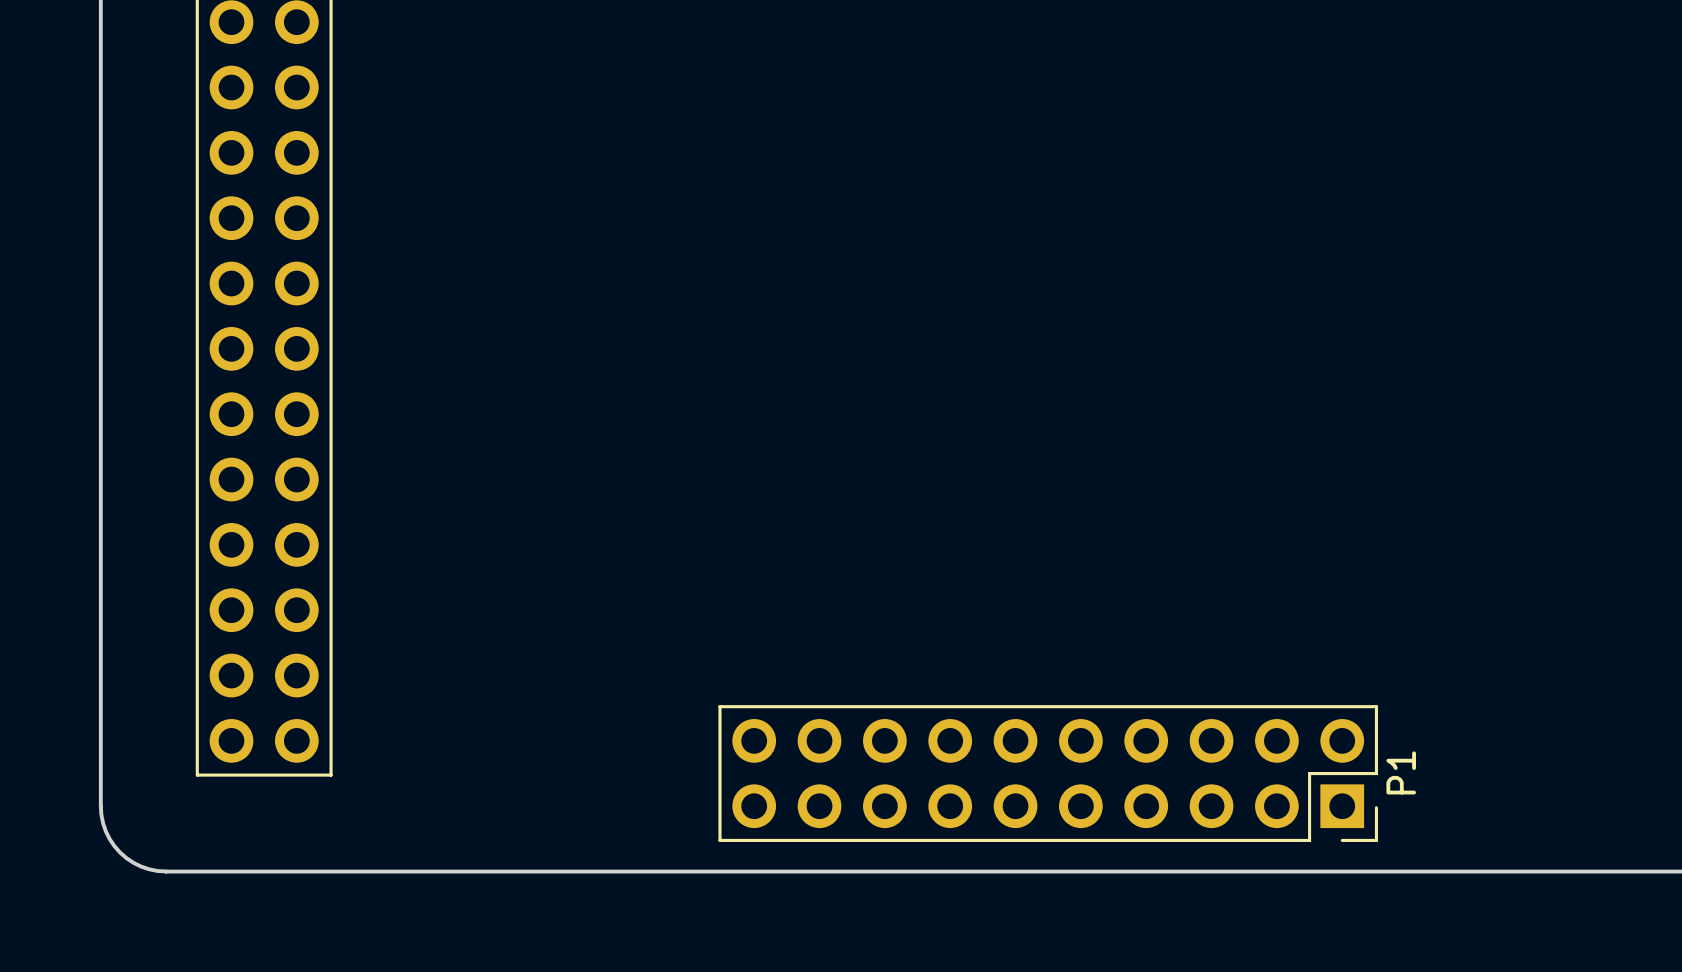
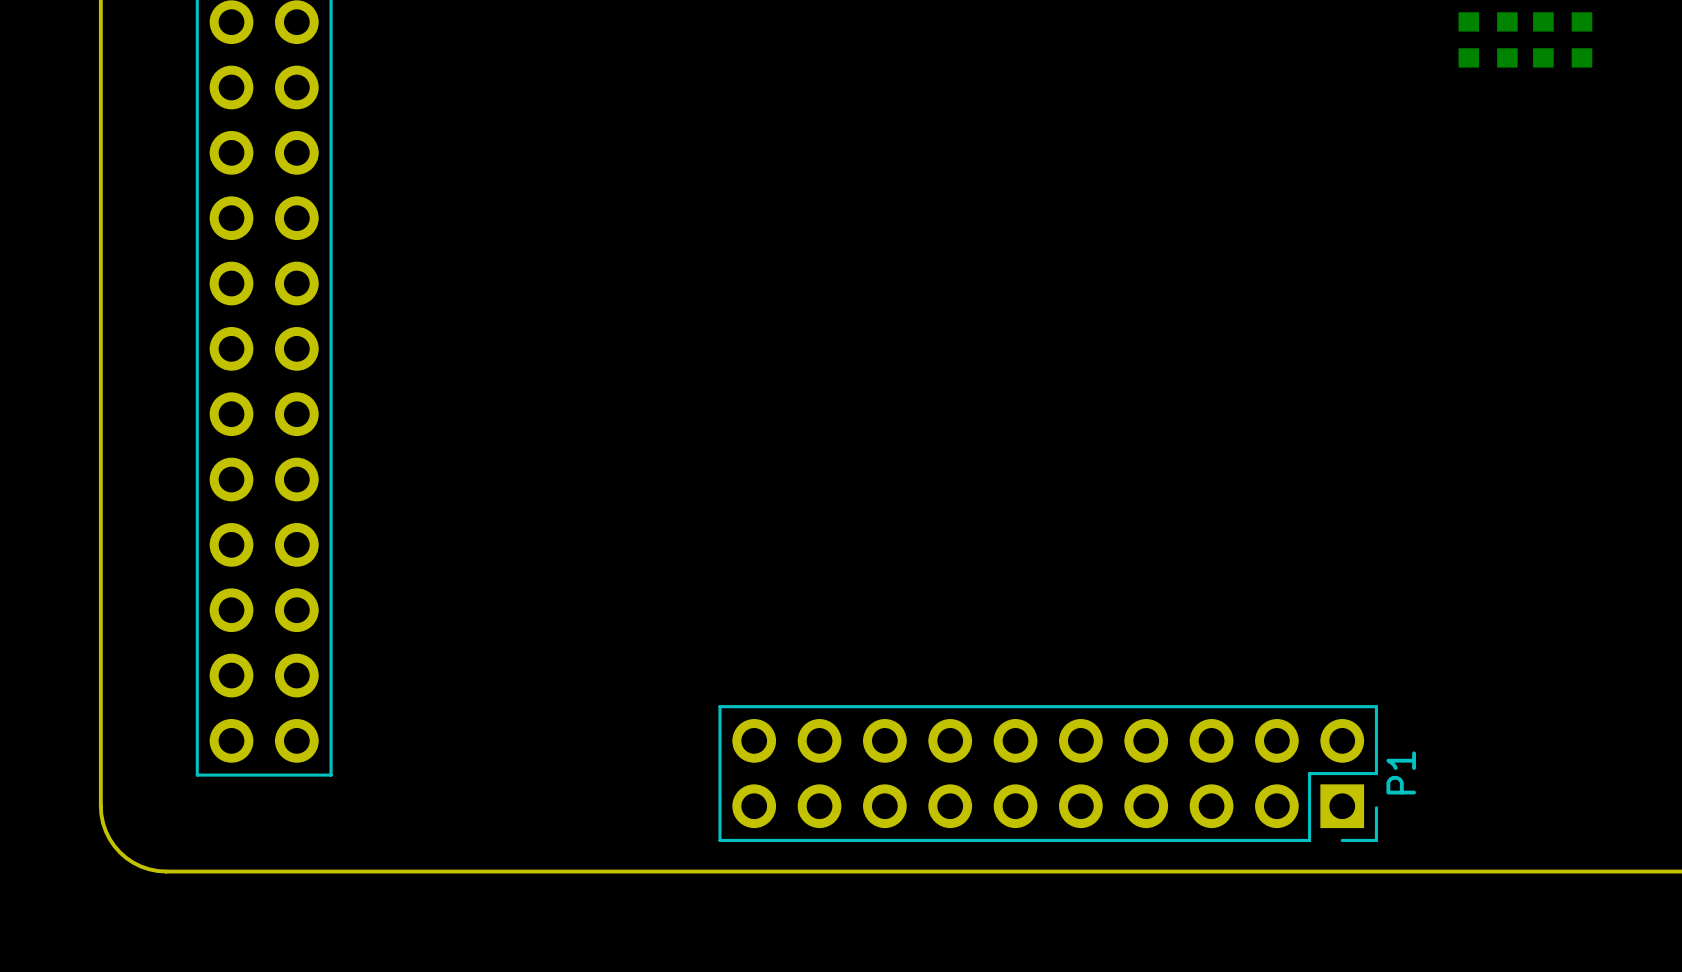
part: none -> (1488, 21)
part: none -> (1562, 21)
part: none -> (1488, 57)
part: none -> (1562, 57)

